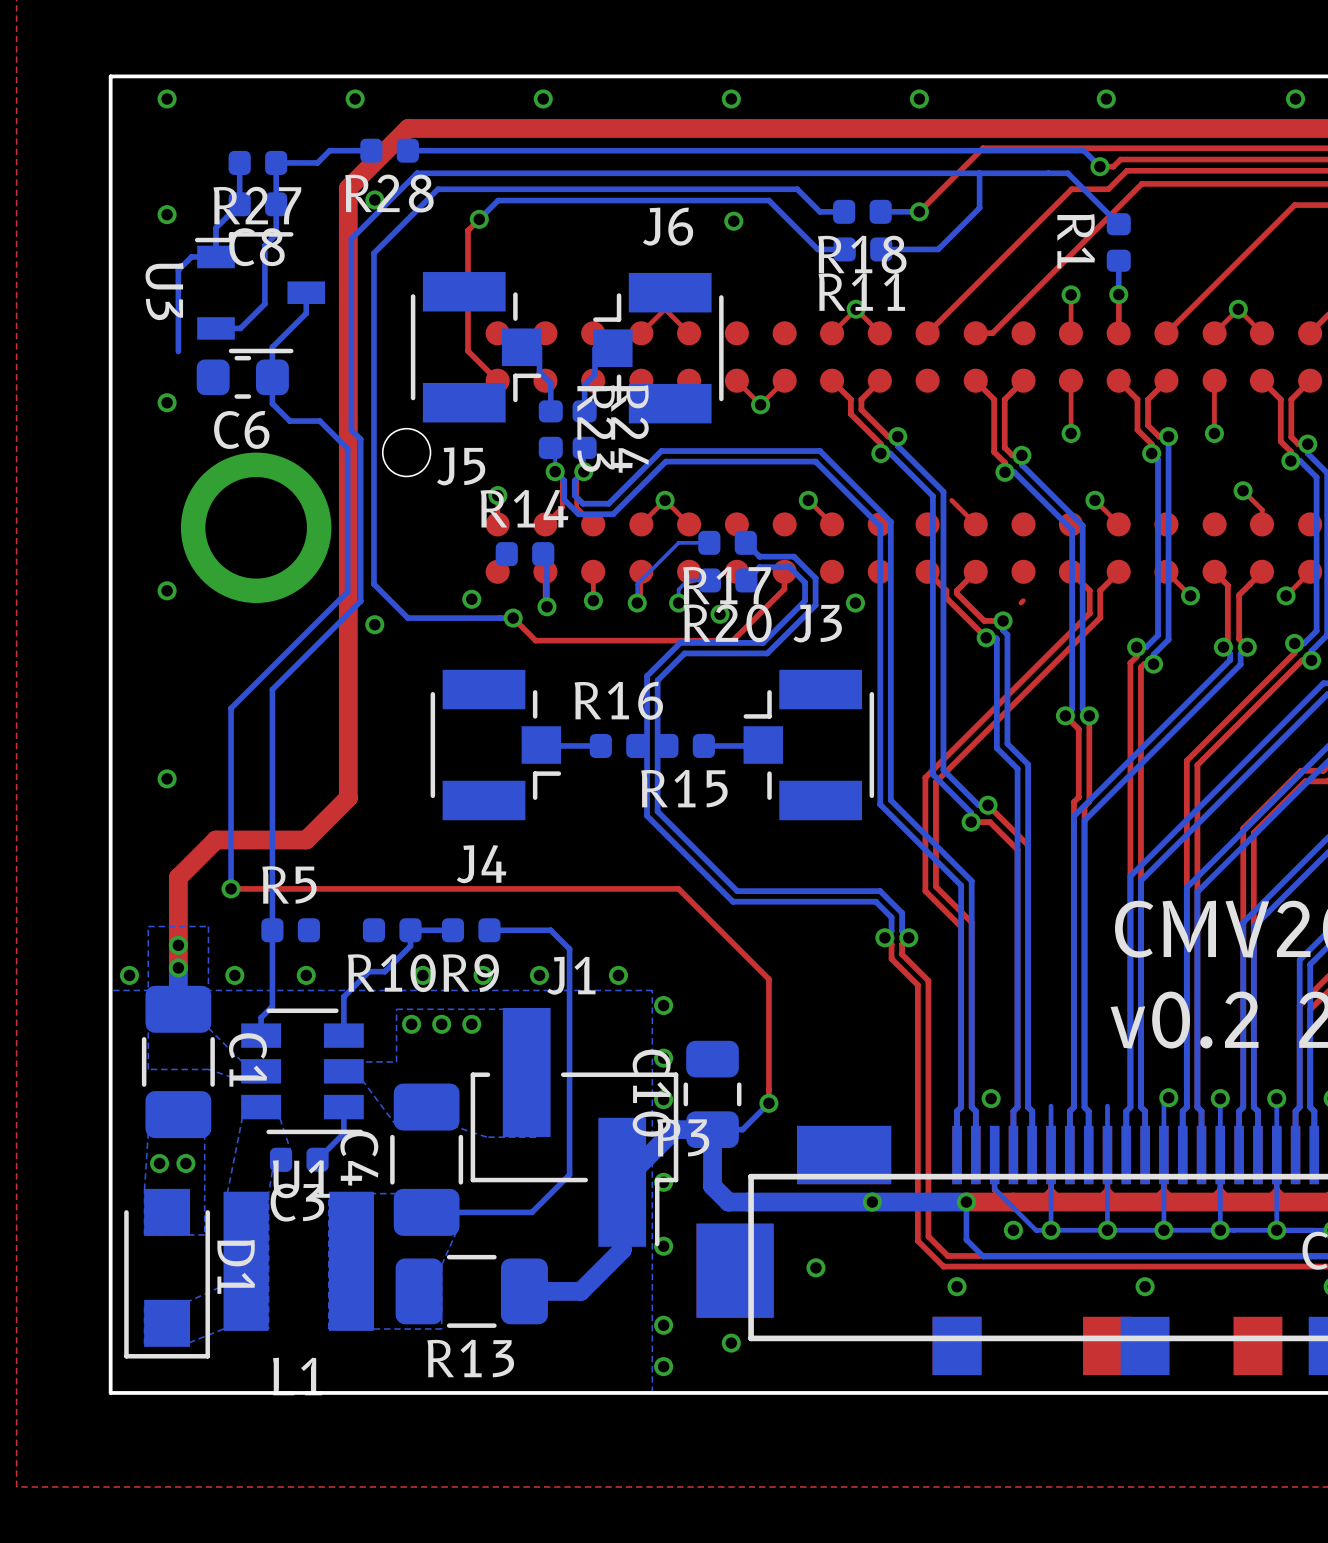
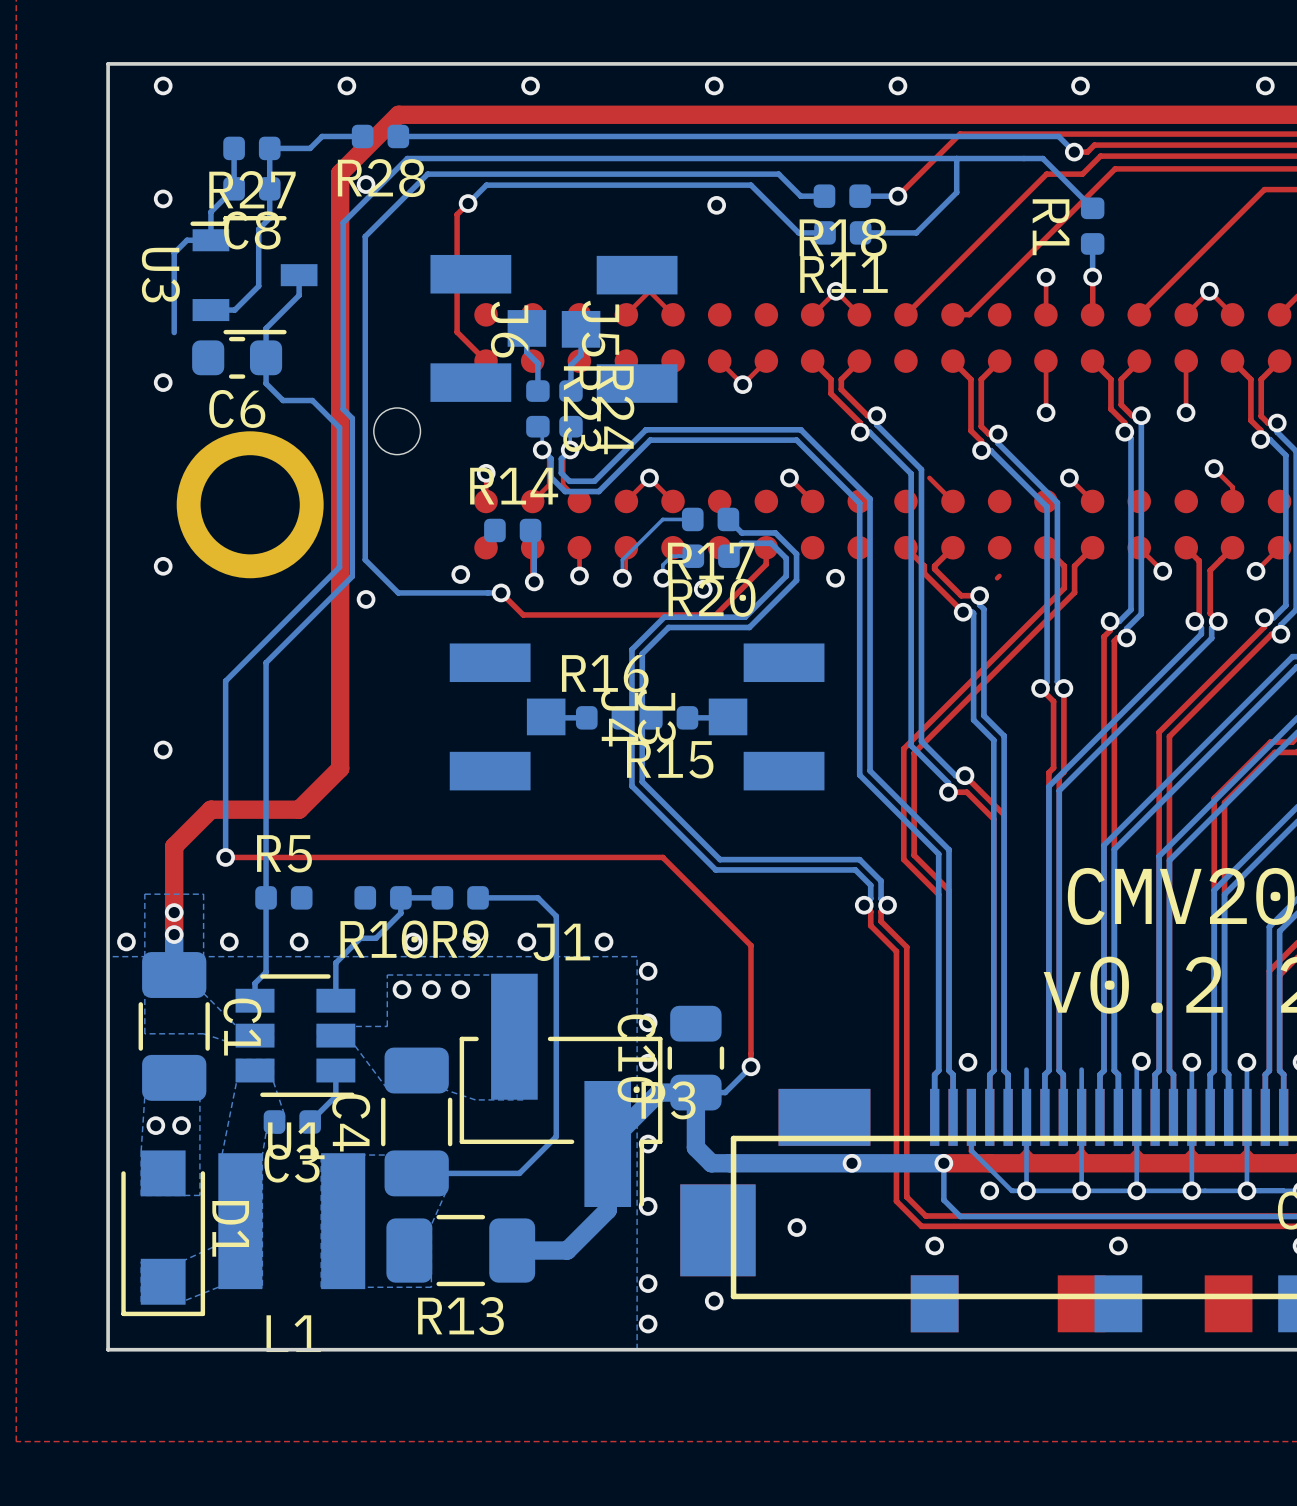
J6 name position: J6 (668, 226) -> J6 (509, 329)
J5 footprint: [410, 272, 542, 423] -> [430, 254, 547, 402]
J6 footprint: [593, 272, 724, 424] -> [561, 255, 678, 403]
J5 name position: J5 (461, 466) -> J5 (600, 328)
J3 name position: J3 (817, 623) -> J3 (656, 716)
J4 footprint: [430, 669, 562, 821] -> [449, 643, 566, 791]
J3 footprint: [743, 669, 875, 821] -> [708, 643, 825, 791]
J4 name position: J4 (481, 864) -> J4 (619, 717)

